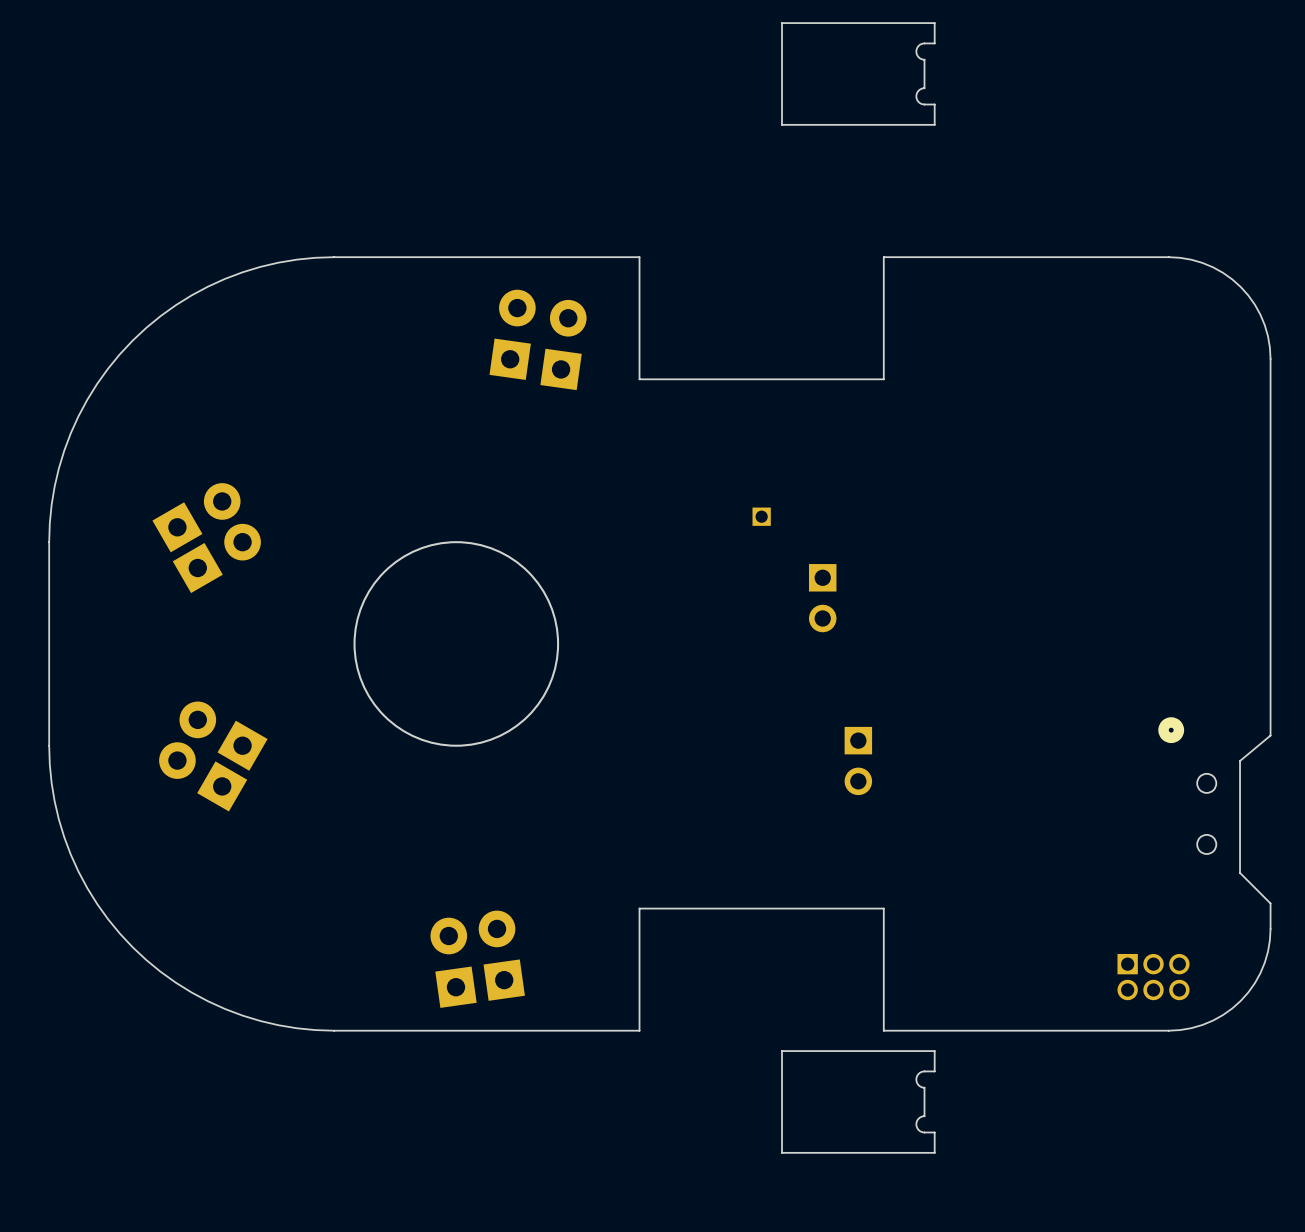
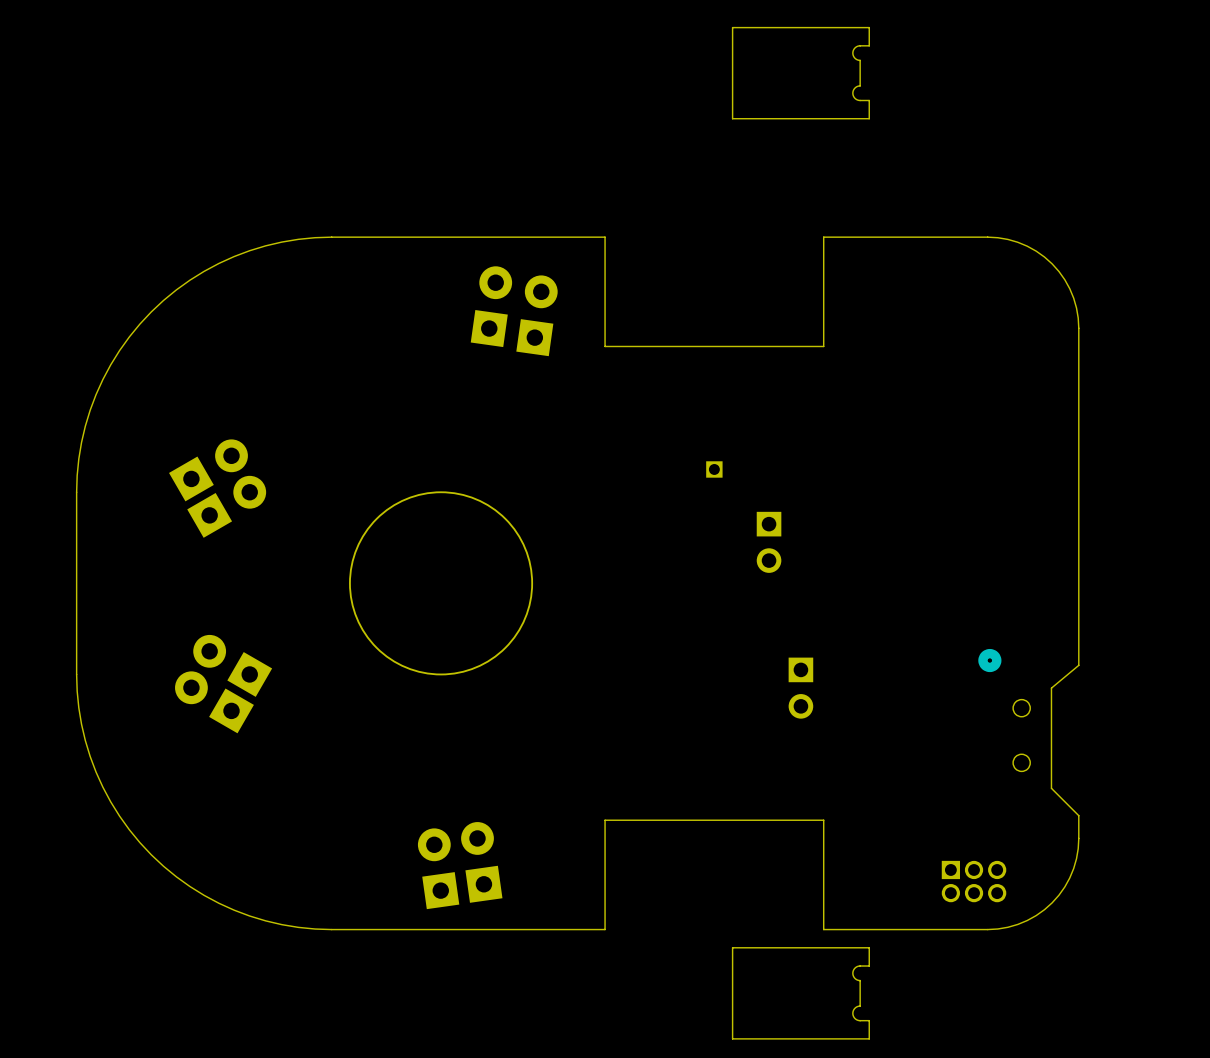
board edge: (1067, 257) (1180, 257) (1212, 267) (1240, 286) (1254, 304) (1264, 325) (1270, 358) (1270, 735) (1240, 760) (1240, 872) (1270, 903) (1269, 940) (1264, 962) (1254, 983) (1240, 1000) (1222, 1015) (1202, 1025) (1168, 1030) (1067, 1030) -> (987, 237) (1017, 242) (1036, 251) (1052, 263) (1069, 288) (1076, 307) (1078, 328) (1078, 665) (1051, 688) (1051, 788) (1078, 815) (1078, 848) (1069, 877) (1058, 895) (1044, 909) (1017, 924) (987, 929)
part position: (1187, 785) -> (1004, 710)
part position: (1153, 977) -> (974, 881)

